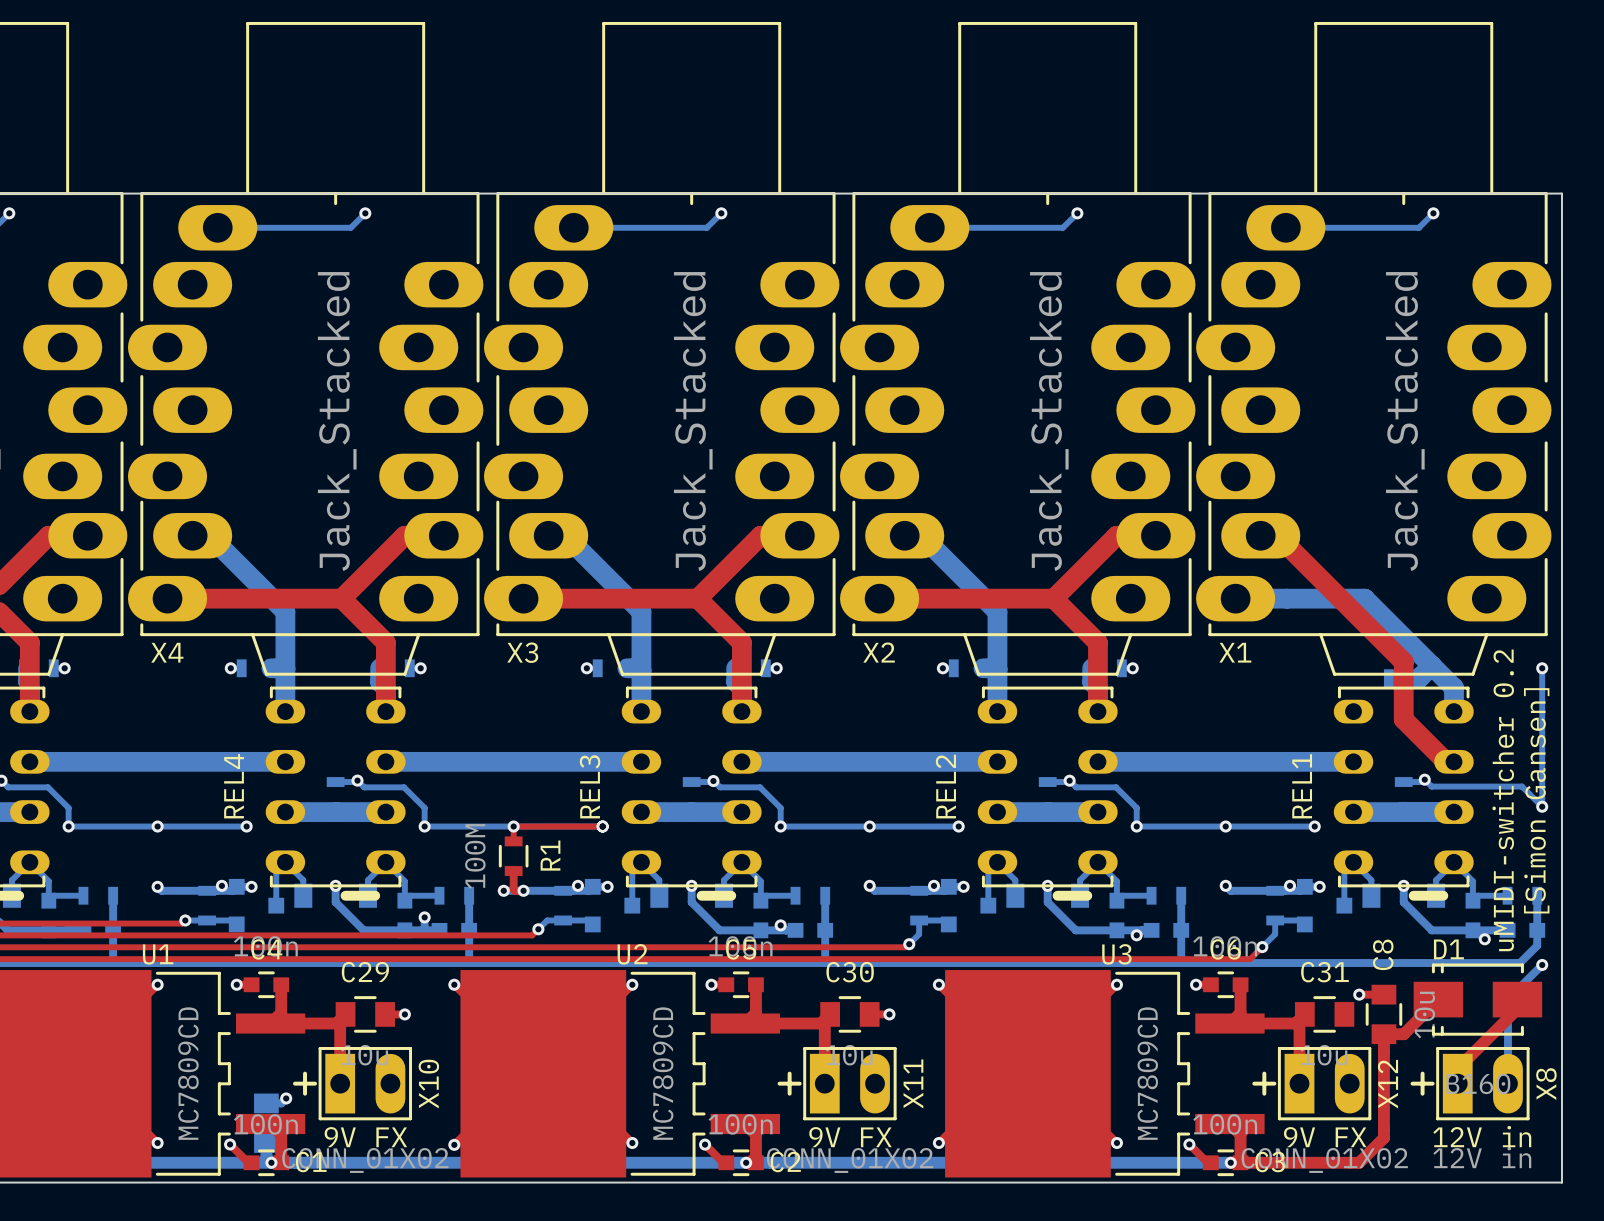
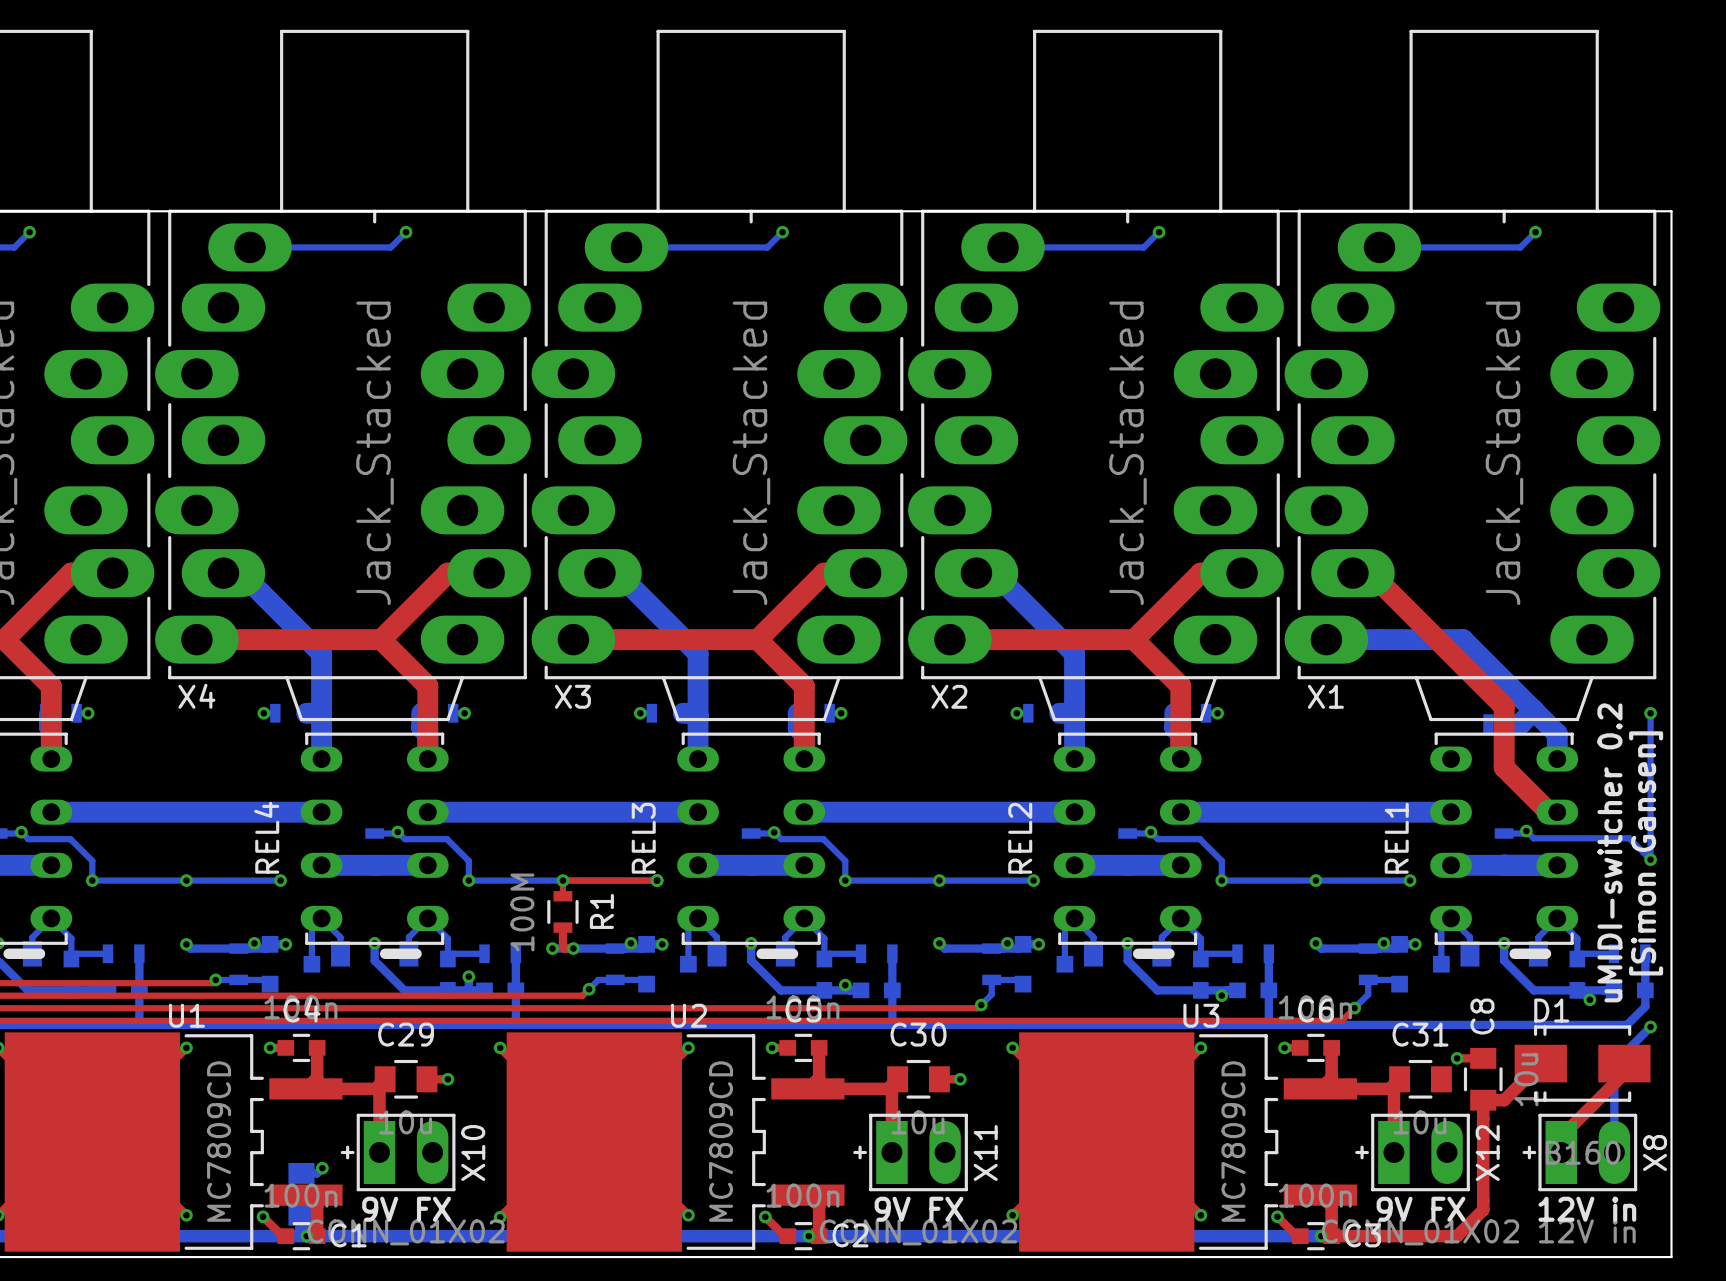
X10 footprint: [293, 1047, 413, 1121] -> [340, 1113, 456, 1192]
X11 footprint: [777, 1047, 897, 1121] -> [853, 1113, 968, 1192]
X12 footprint: [1252, 1047, 1372, 1121] -> [1355, 1113, 1470, 1192]
X8 footprint: [1410, 1047, 1530, 1121] -> [1522, 1113, 1638, 1192]

